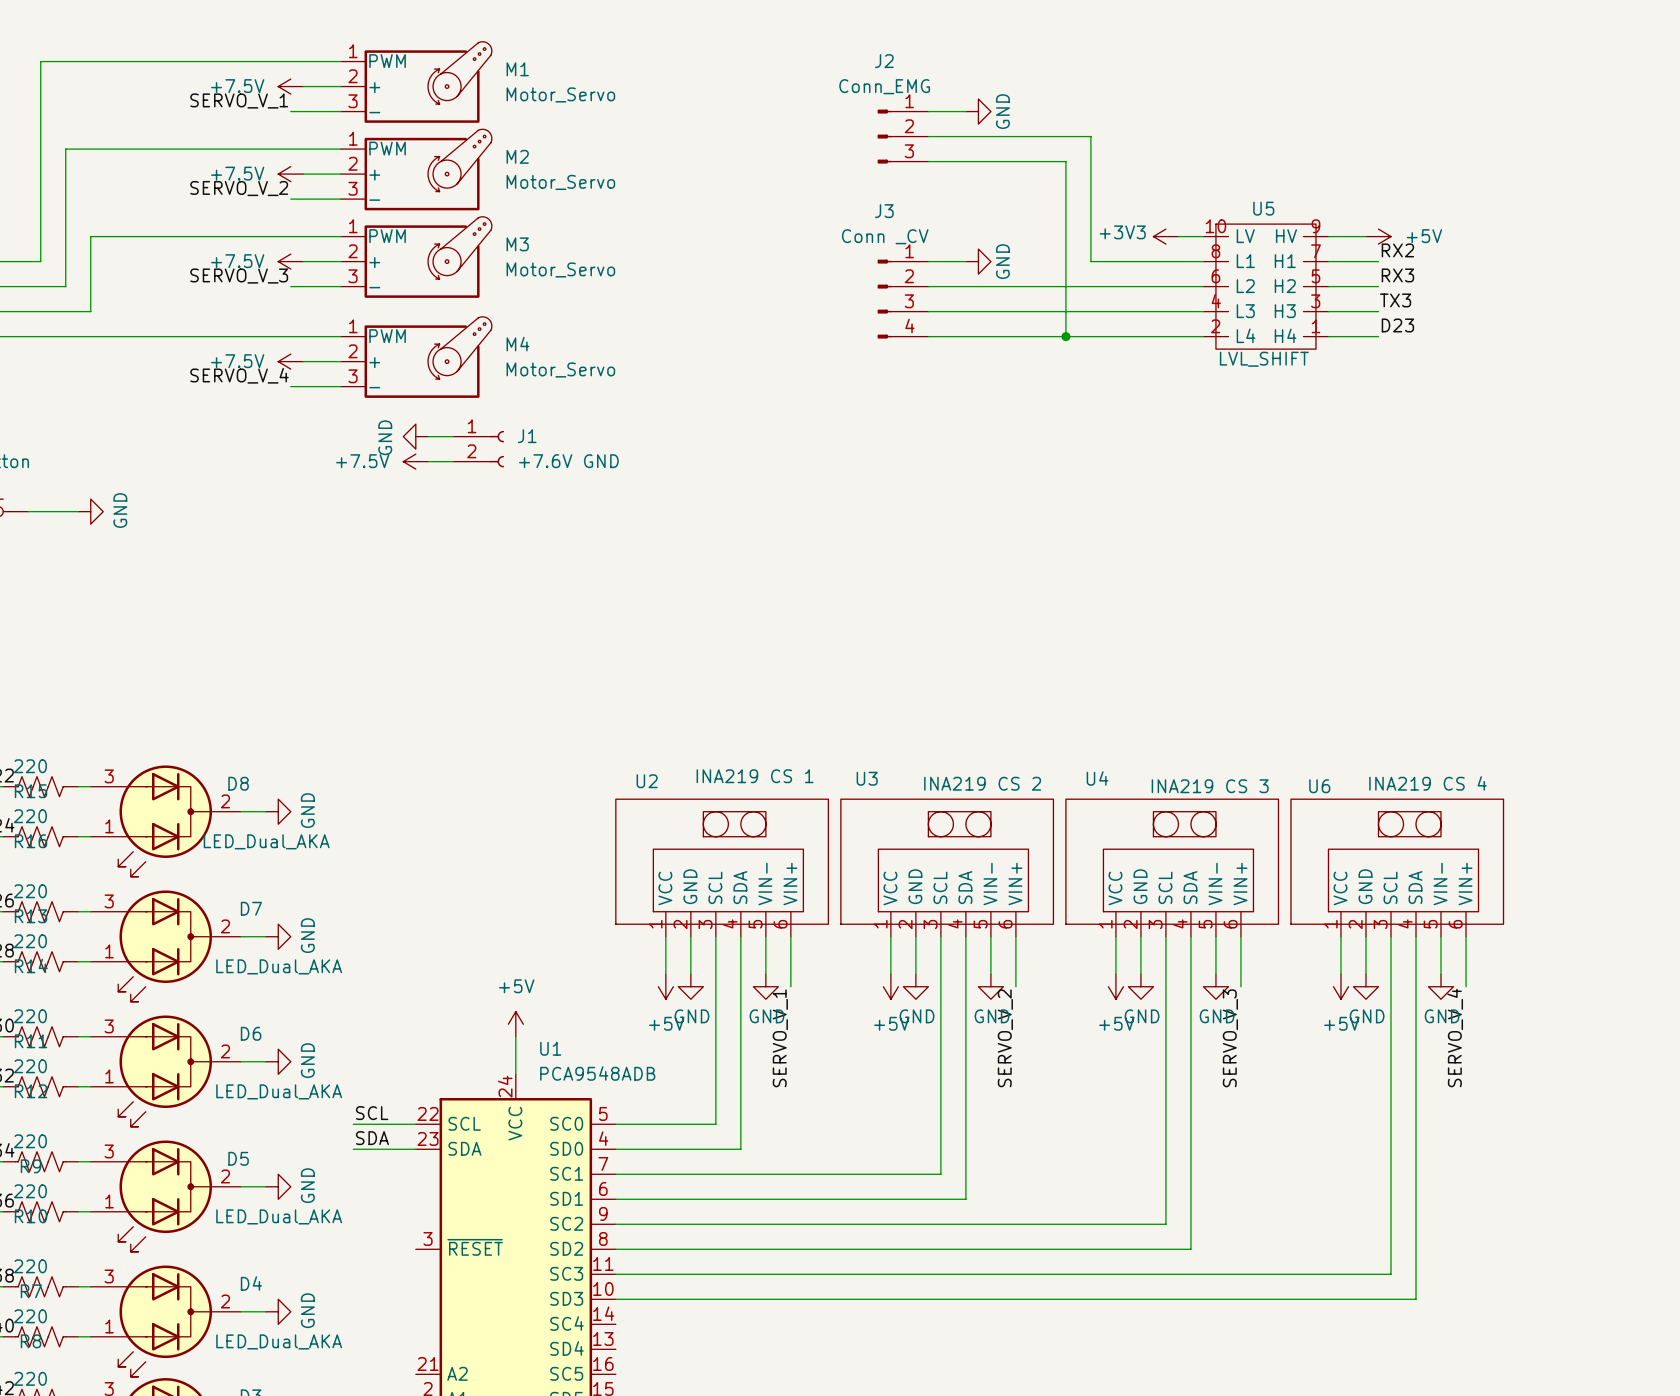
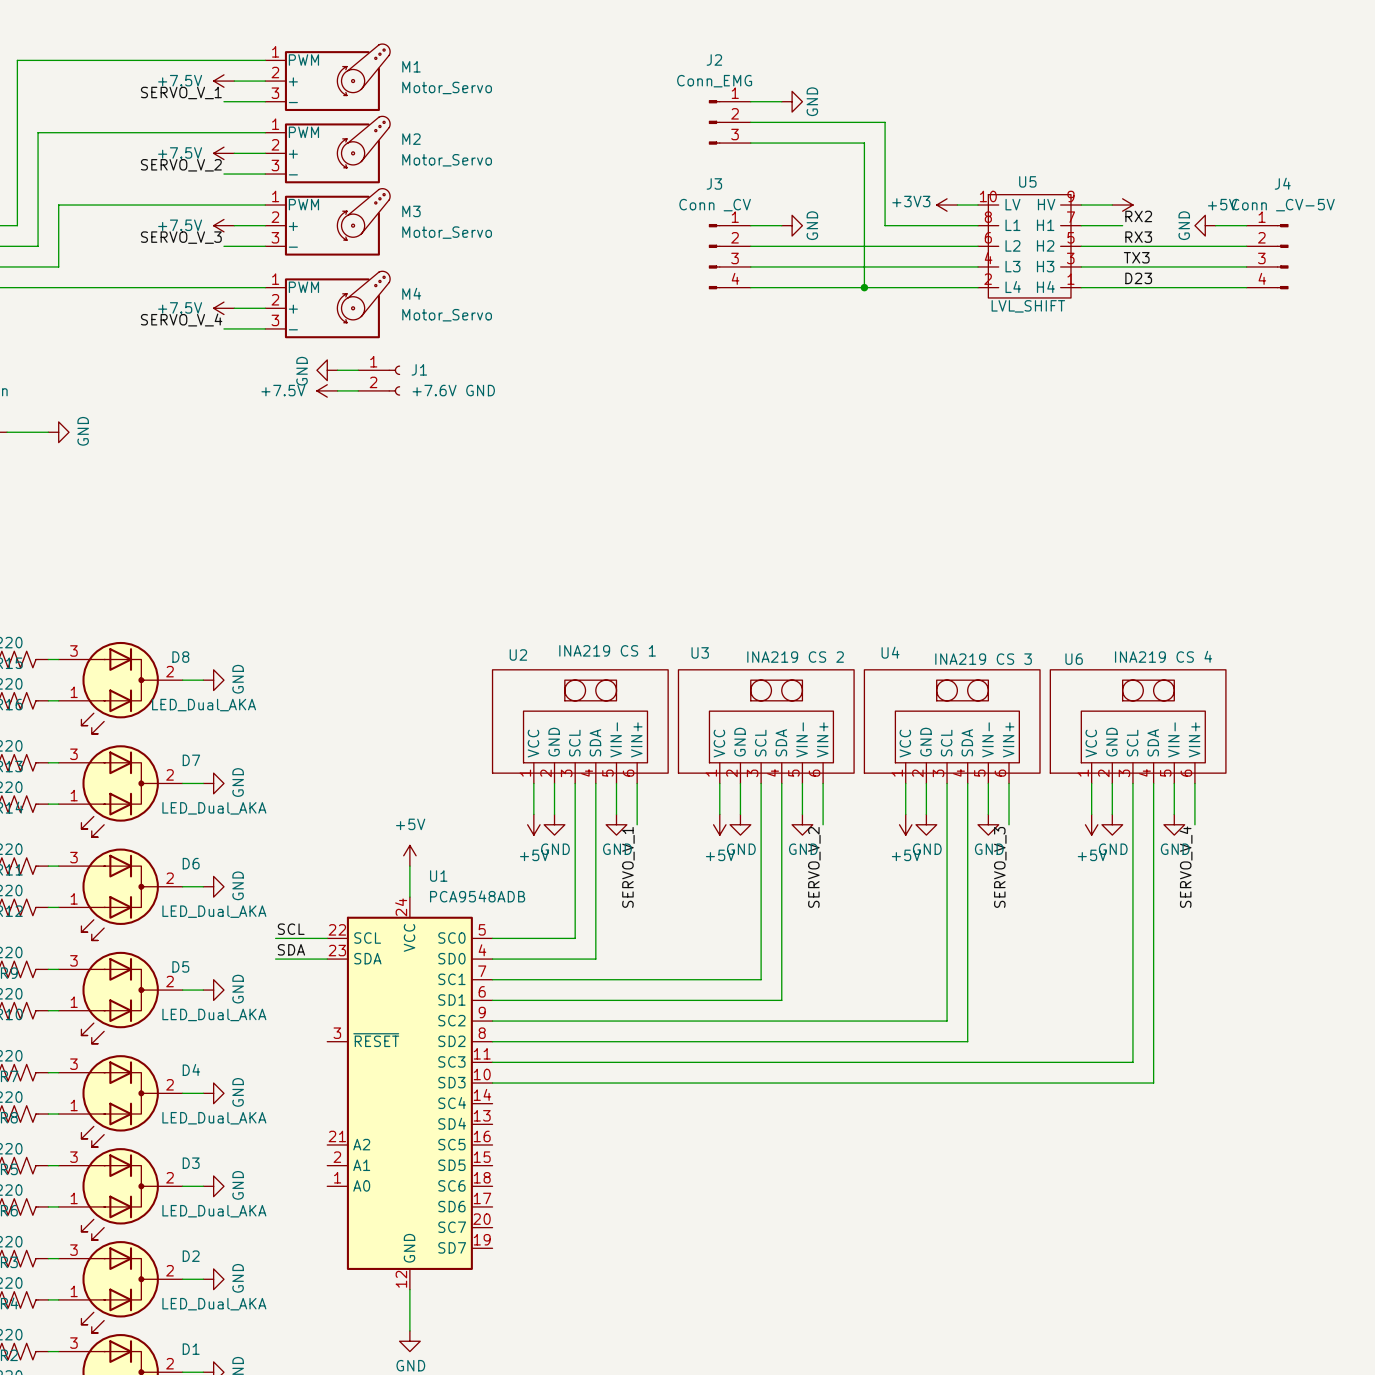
power symbol text position: +5V (1424, 236) -> +5V (1222, 204)
power symbol: none -> GND (1205, 225)
wire: none -> (1215, 225) (1246, 225)
wire: none -> (1122, 246) (1246, 246)
J4: none -> Conn _CV-5V (1267, 256)
wire: none -> (1122, 266) (1246, 266)
wire: none -> (1122, 287) (1246, 287)

